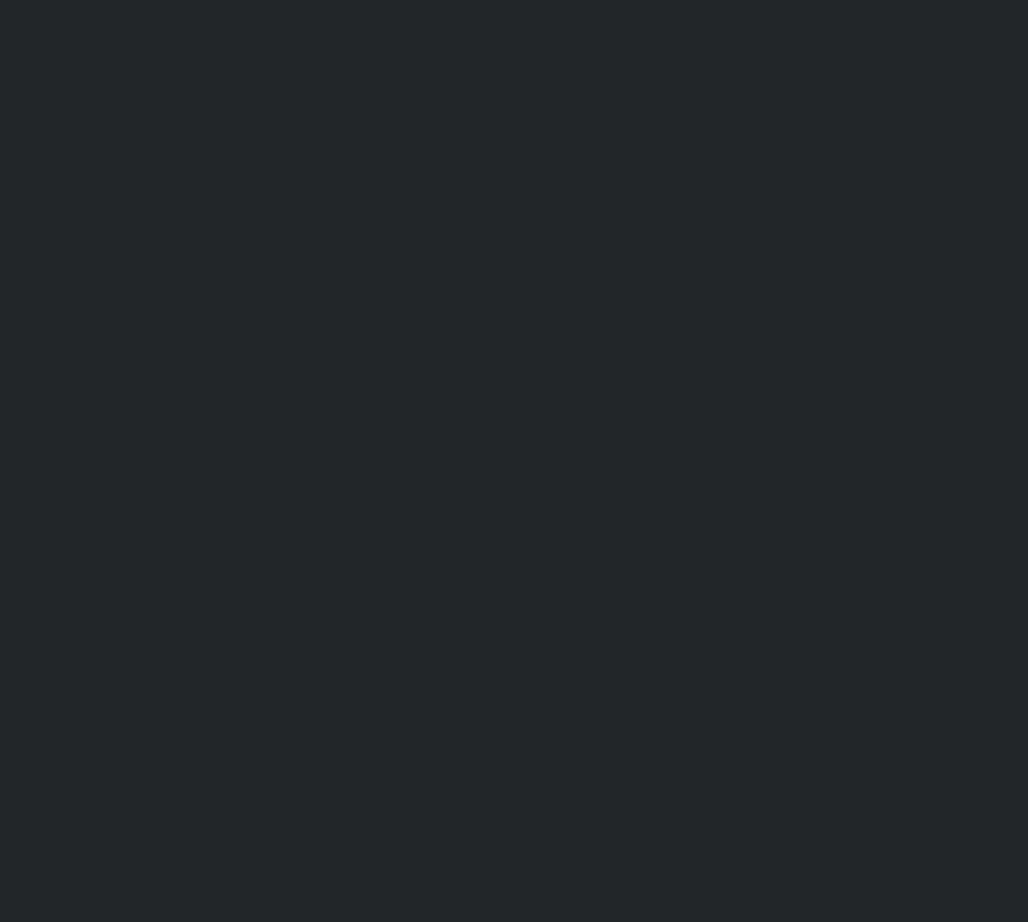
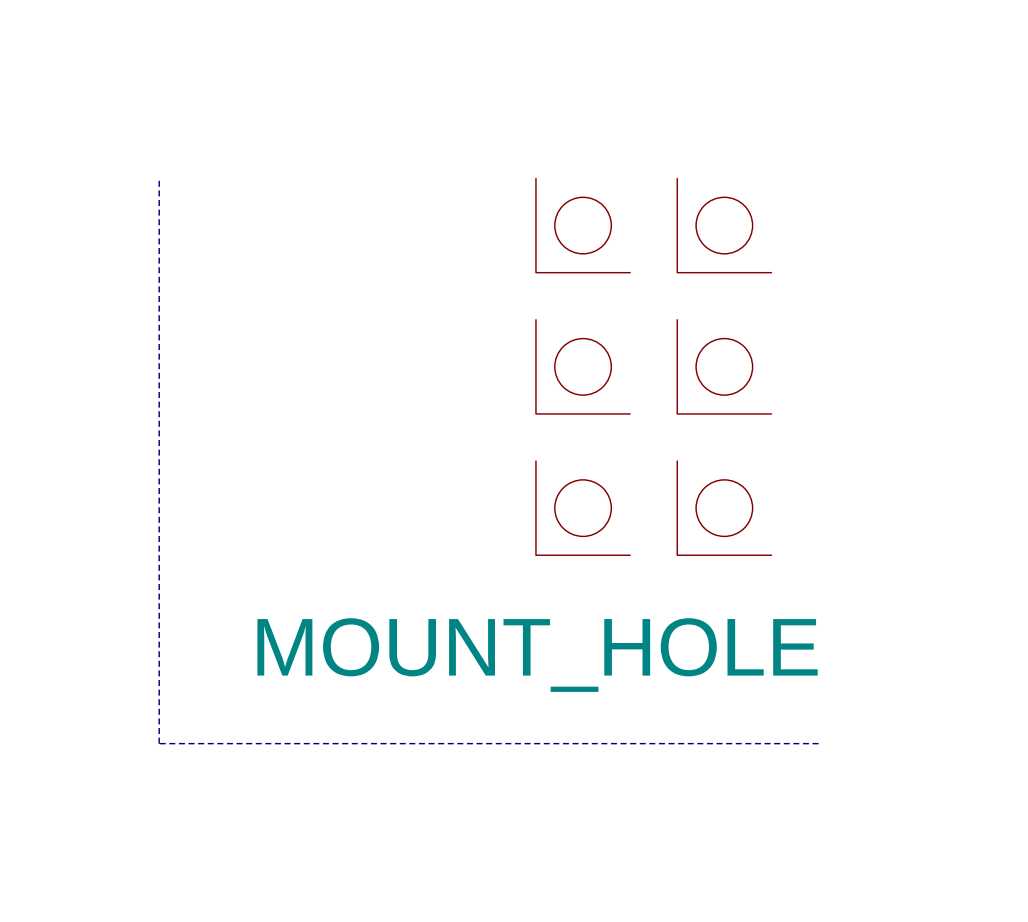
line: none -> (159, 178) (159, 743) (818, 743)
part: none -> MOUNT_HOLE (583, 225)
part: none -> (724, 225)
part: none -> (583, 366)
part: none -> (724, 366)
part: none -> (583, 508)
part: none -> (724, 508)

